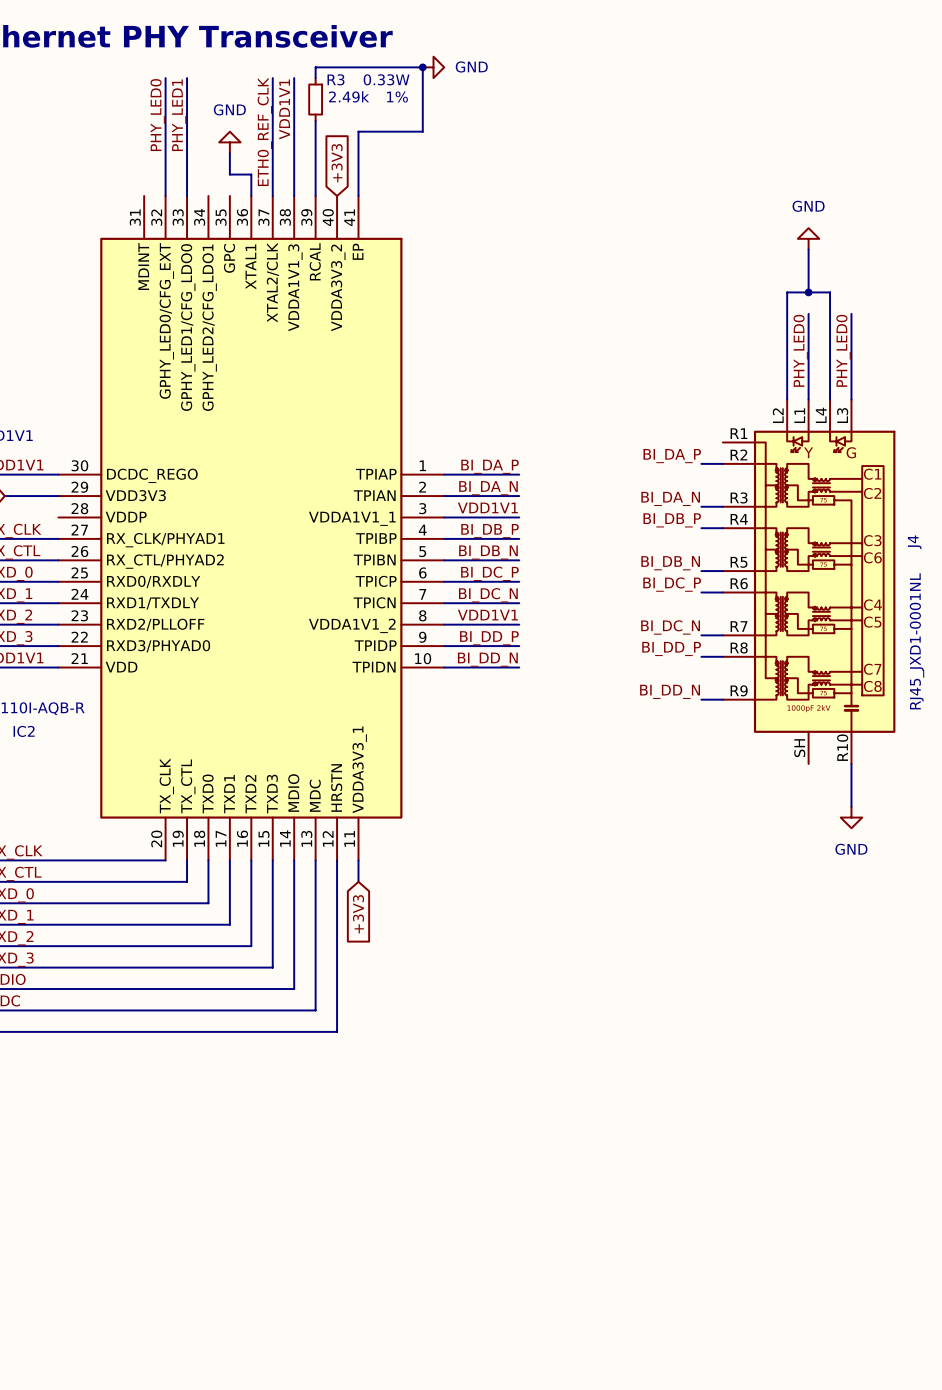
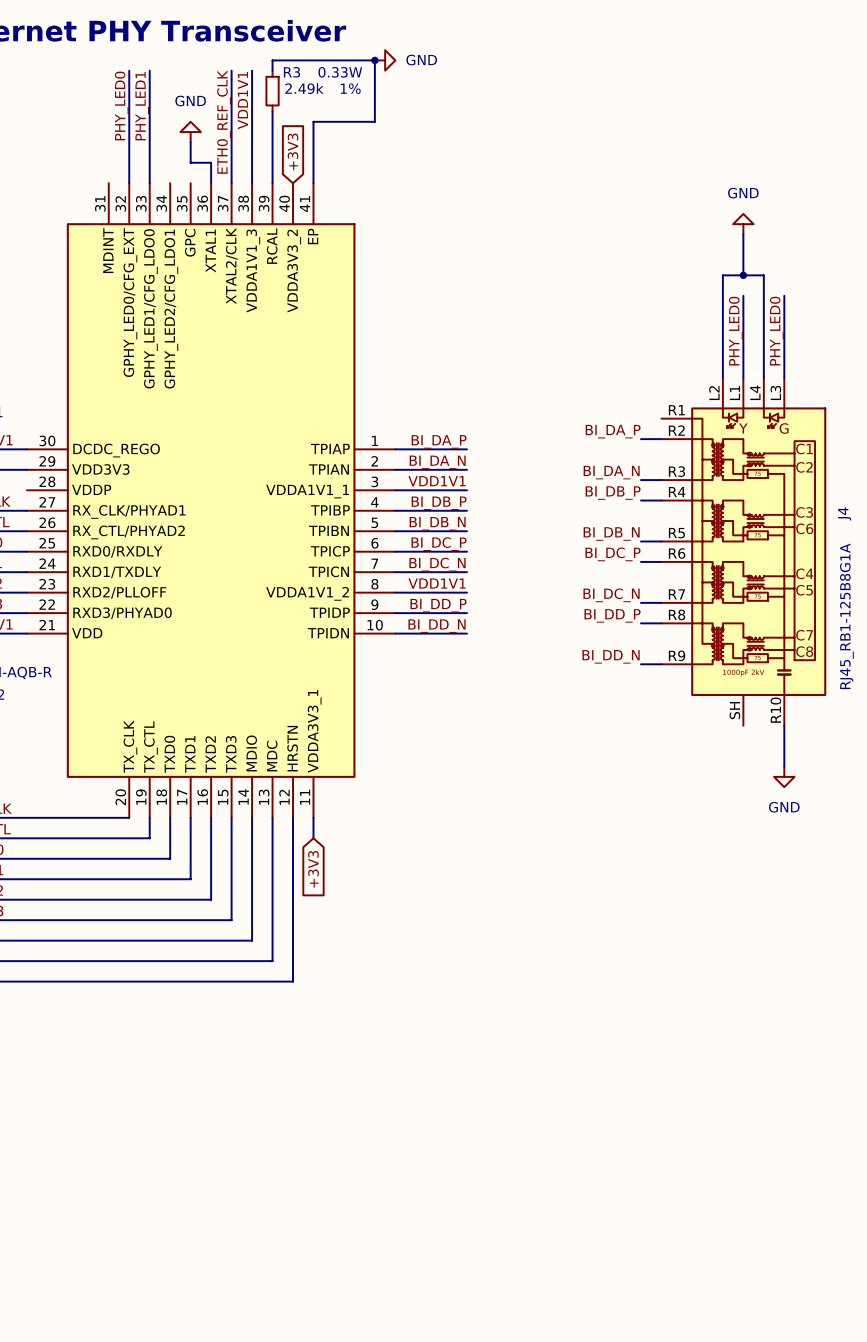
J4 value: RJ45_JXD1-0001NL (917, 641) -> RJ45_RB1-125B8G1A (846, 616)

